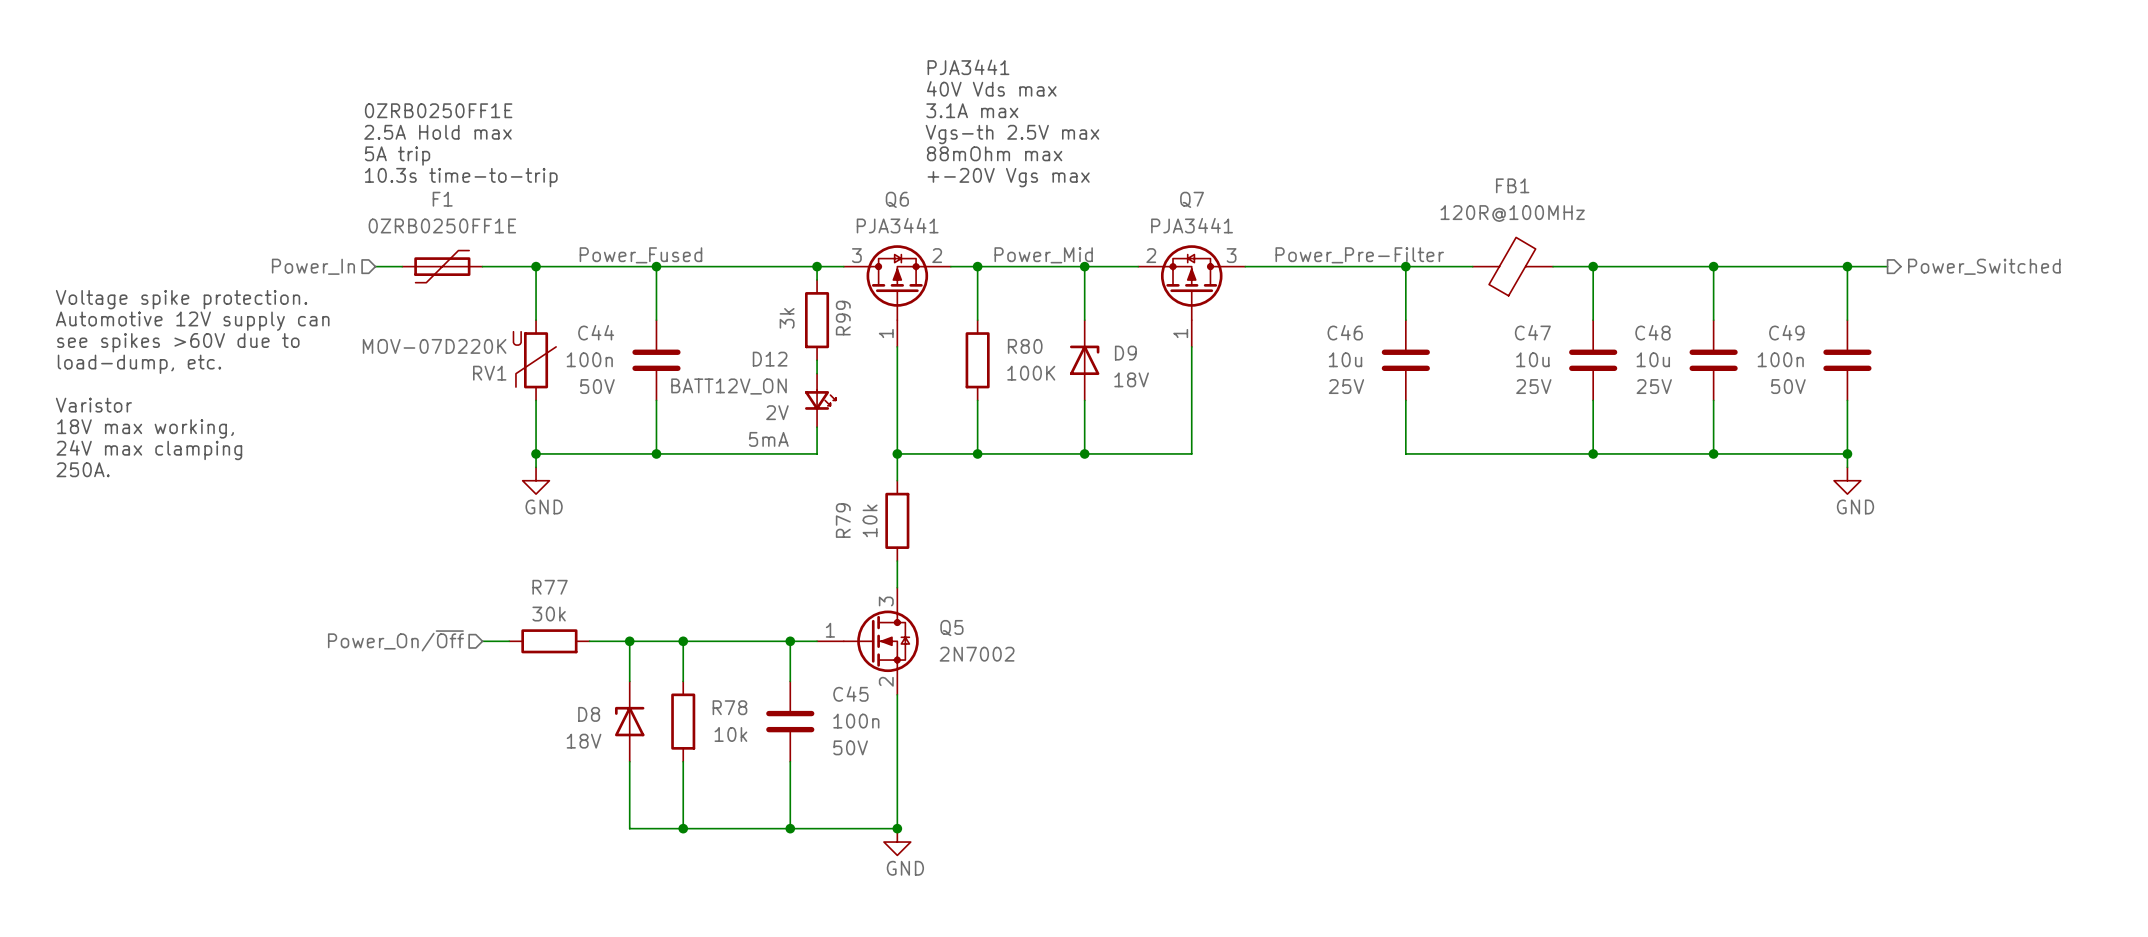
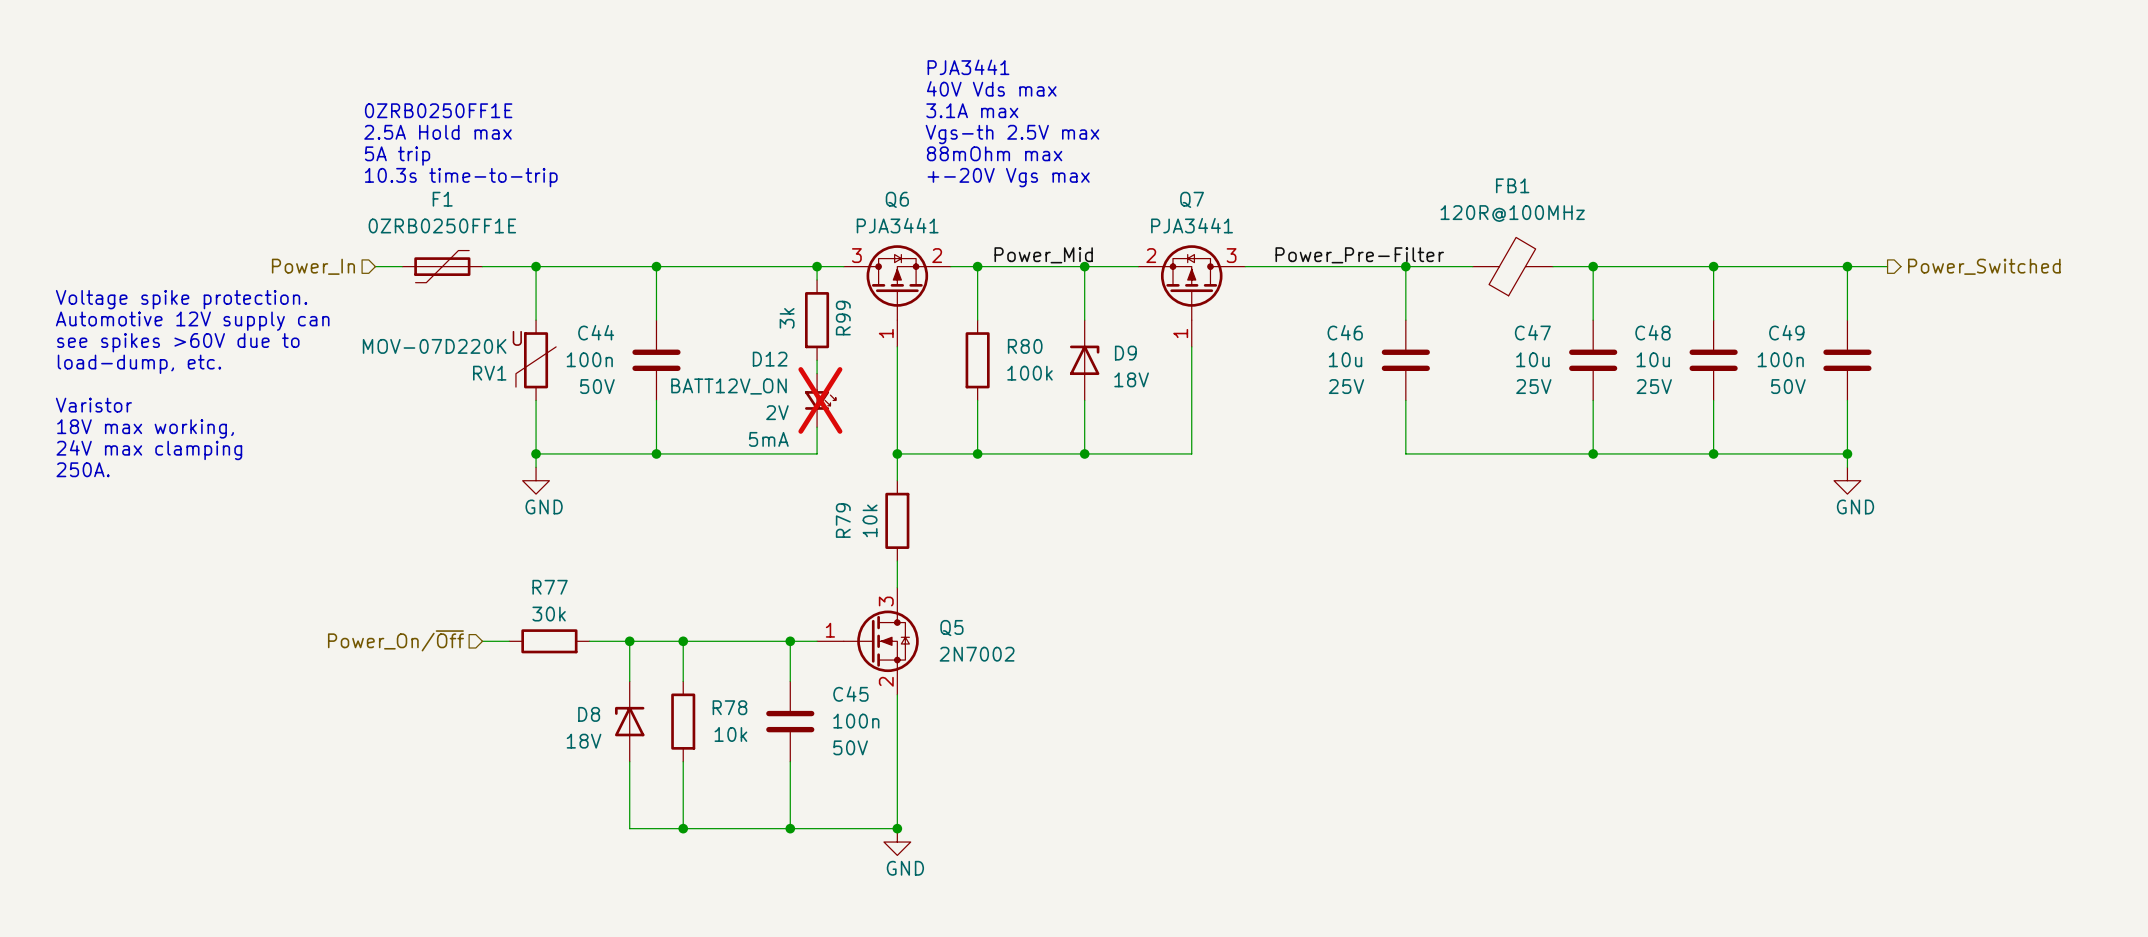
label: Power_Fused (640, 255) -> none
R80 value: 100K (1031, 373) -> 100k (1029, 373)
D12 do-not-place cross: none -> (820, 400)

